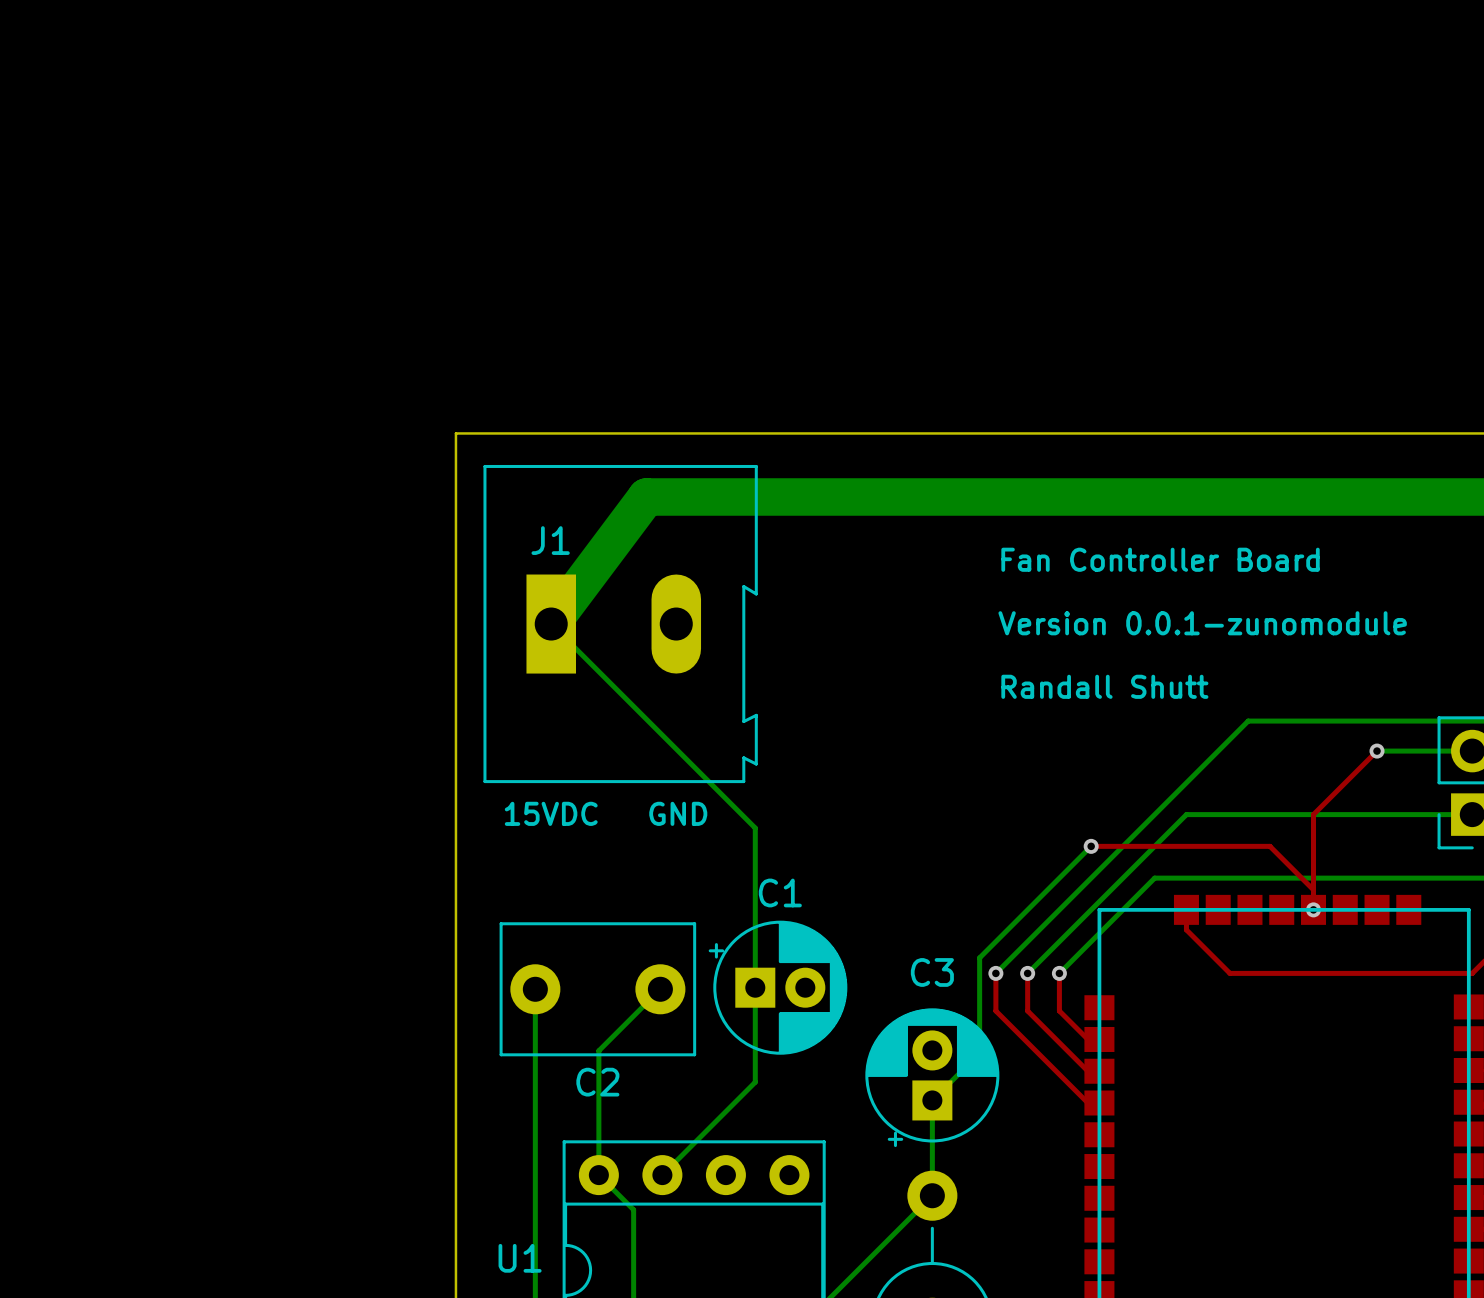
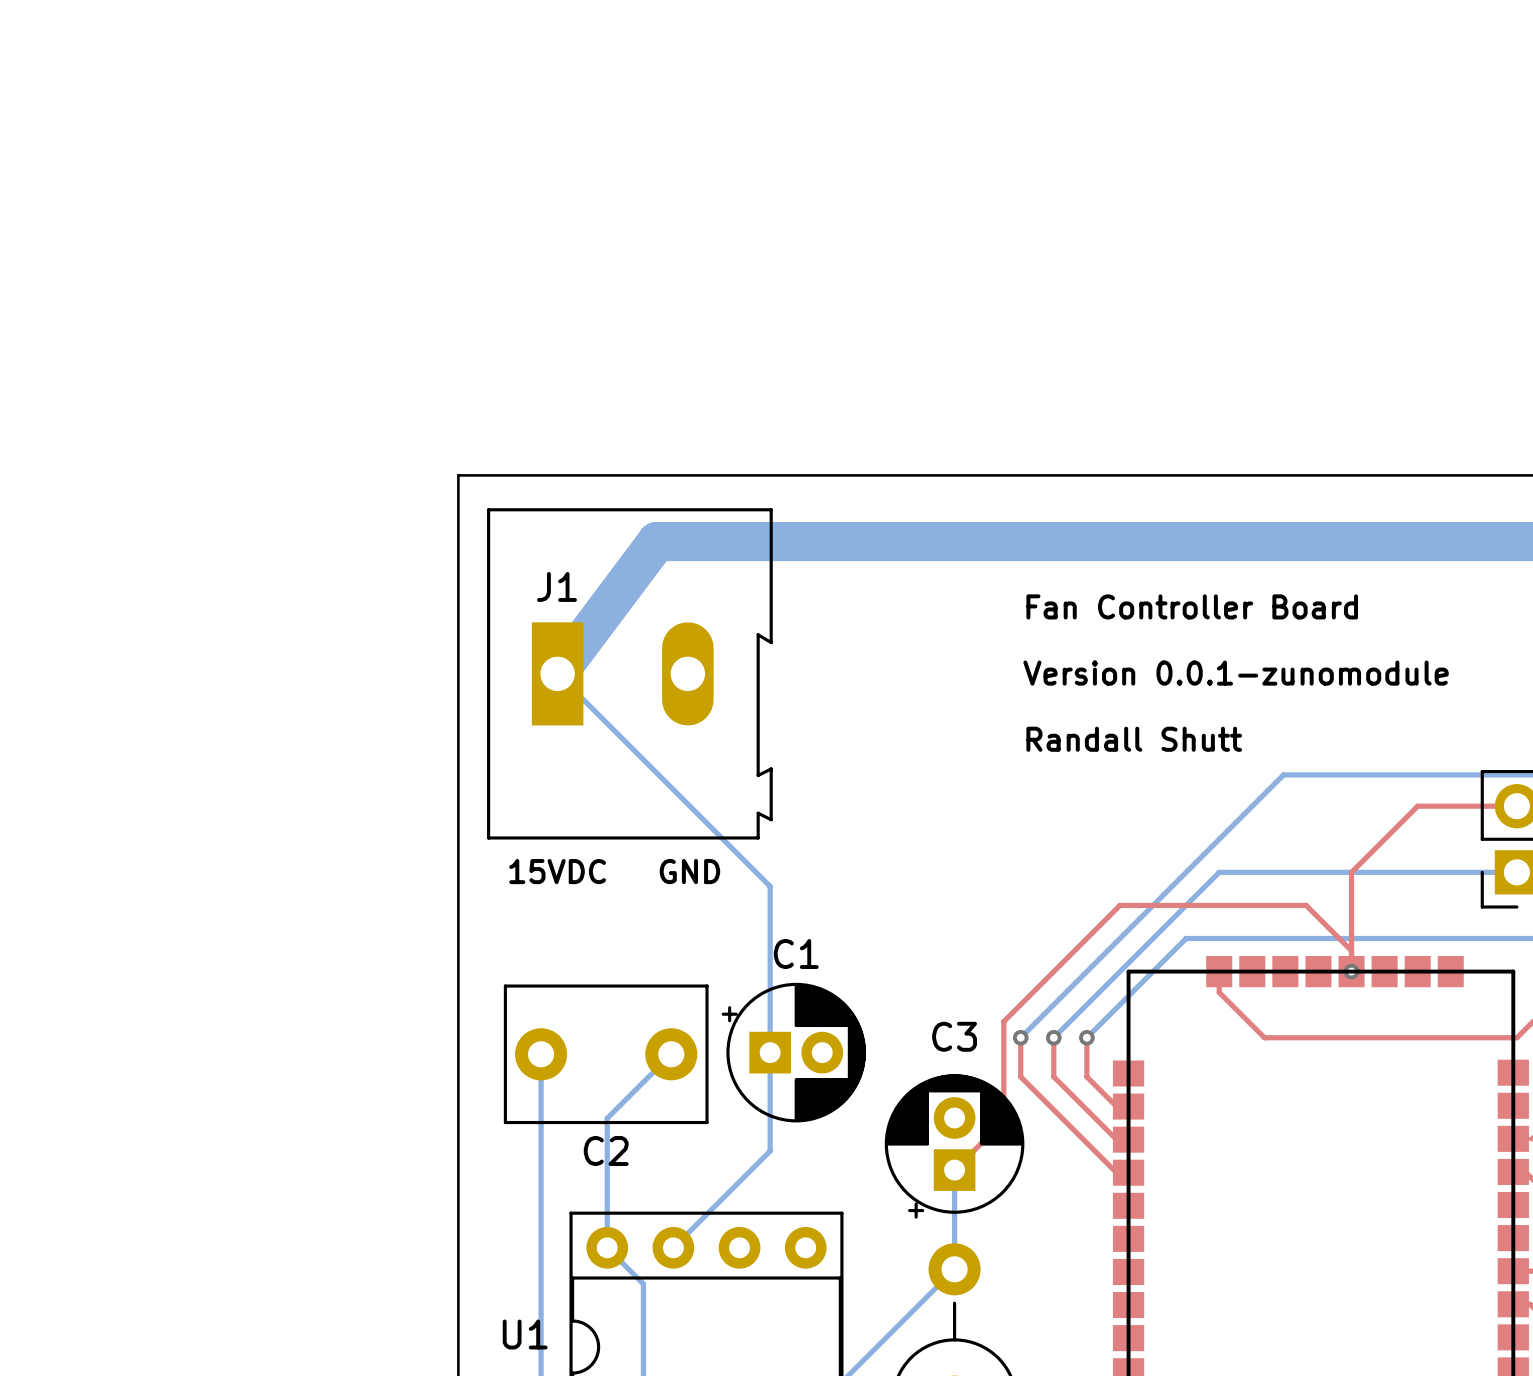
bottom track: (1377, 751) (1472, 751) -> none
top track: none -> (1417, 806) (1516, 806)
via: (1377, 751) -> none
bottom track: (1091, 846) (979, 957) (979, 1053) (932, 1100) -> none
top track: none -> (1119, 905) (1003, 1021) (1003, 1120) (954, 1170)
via: (1091, 846) -> none

